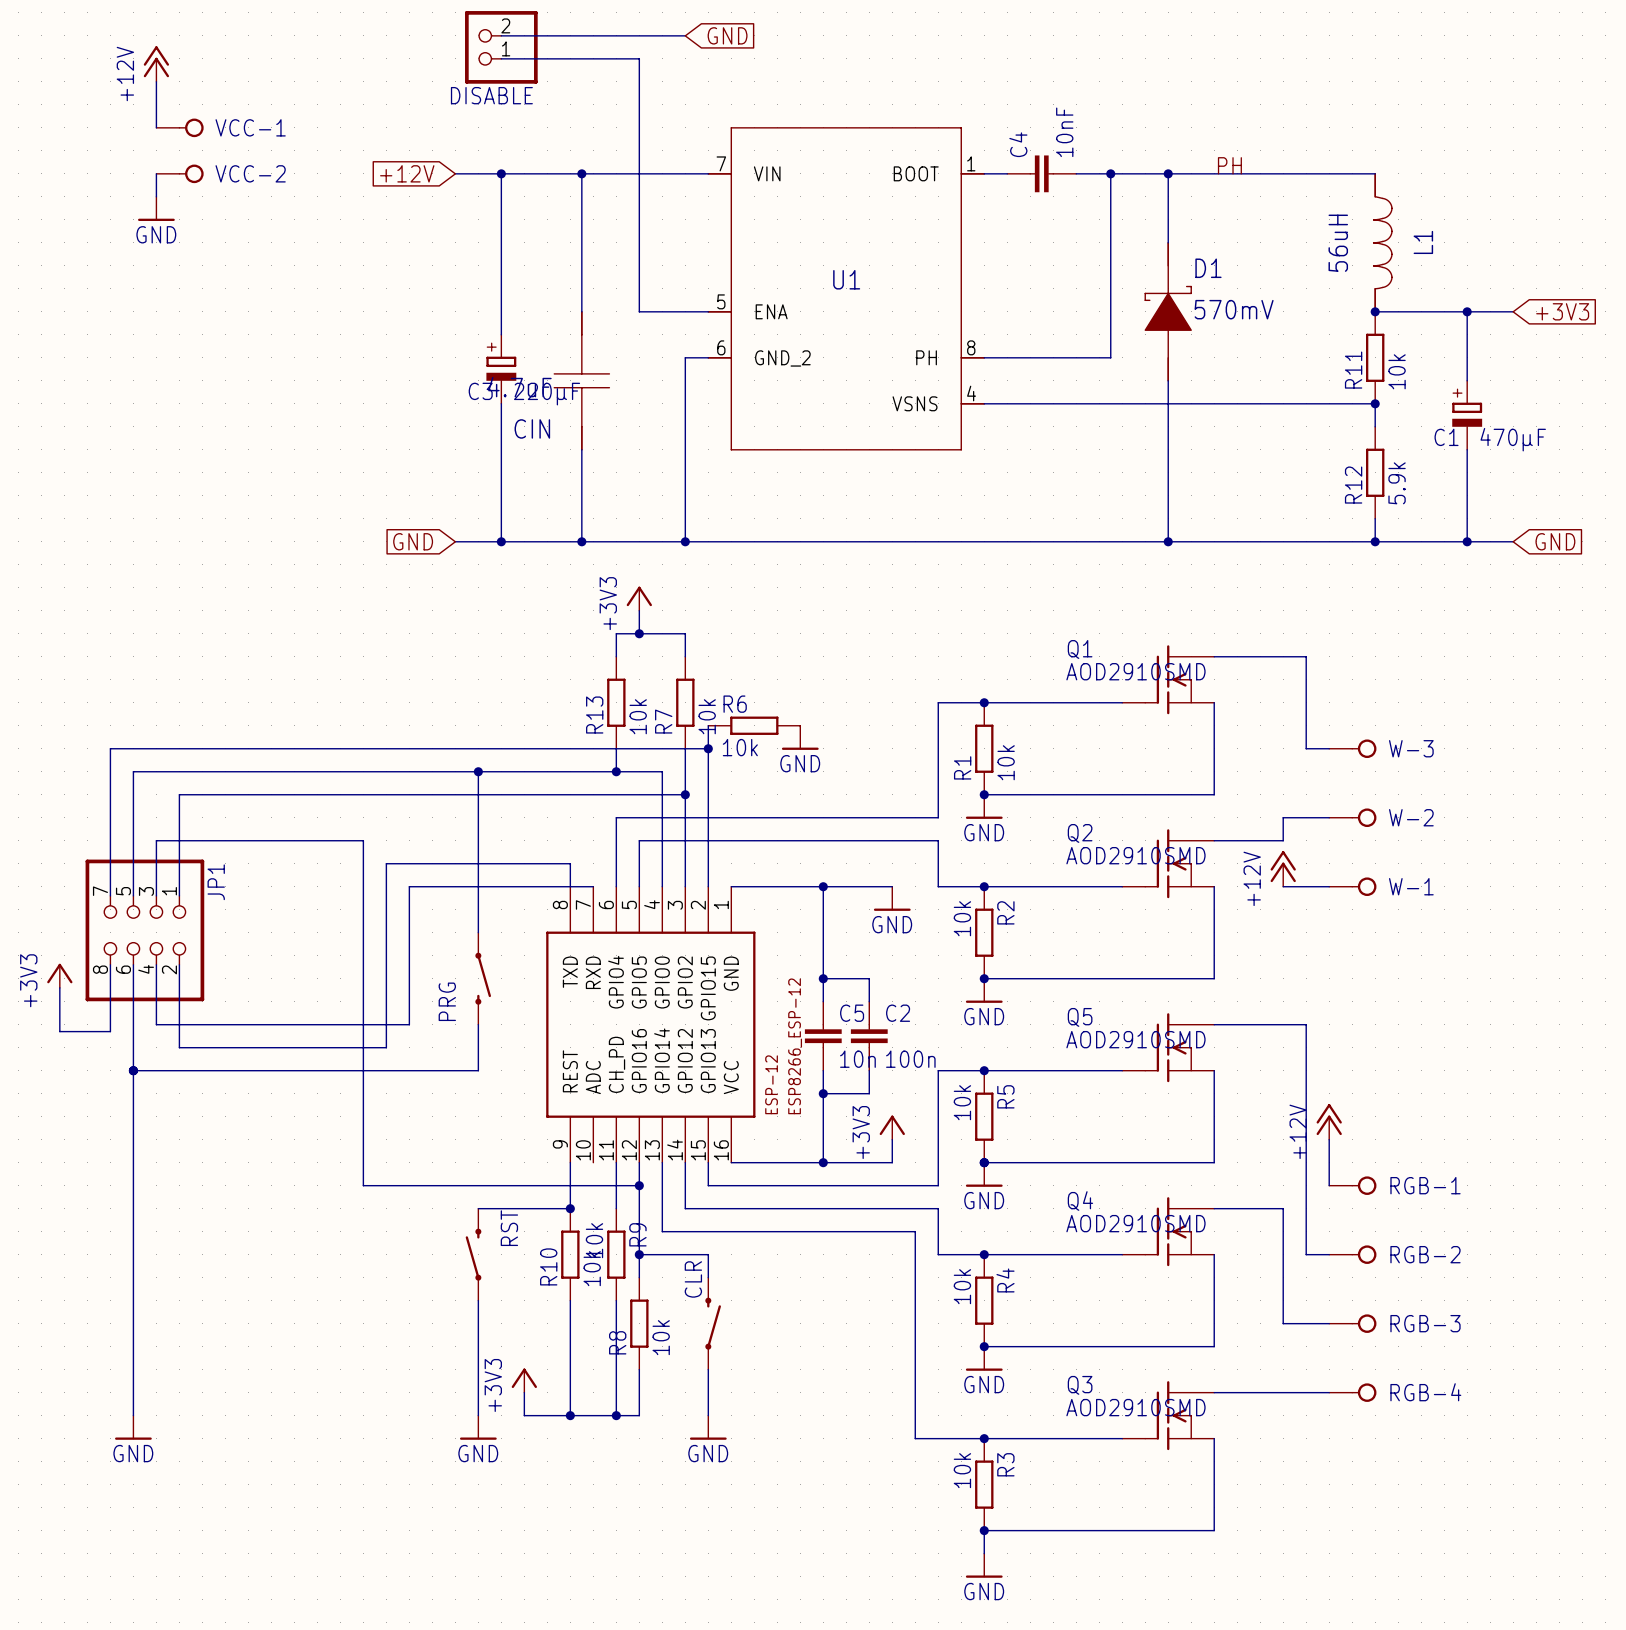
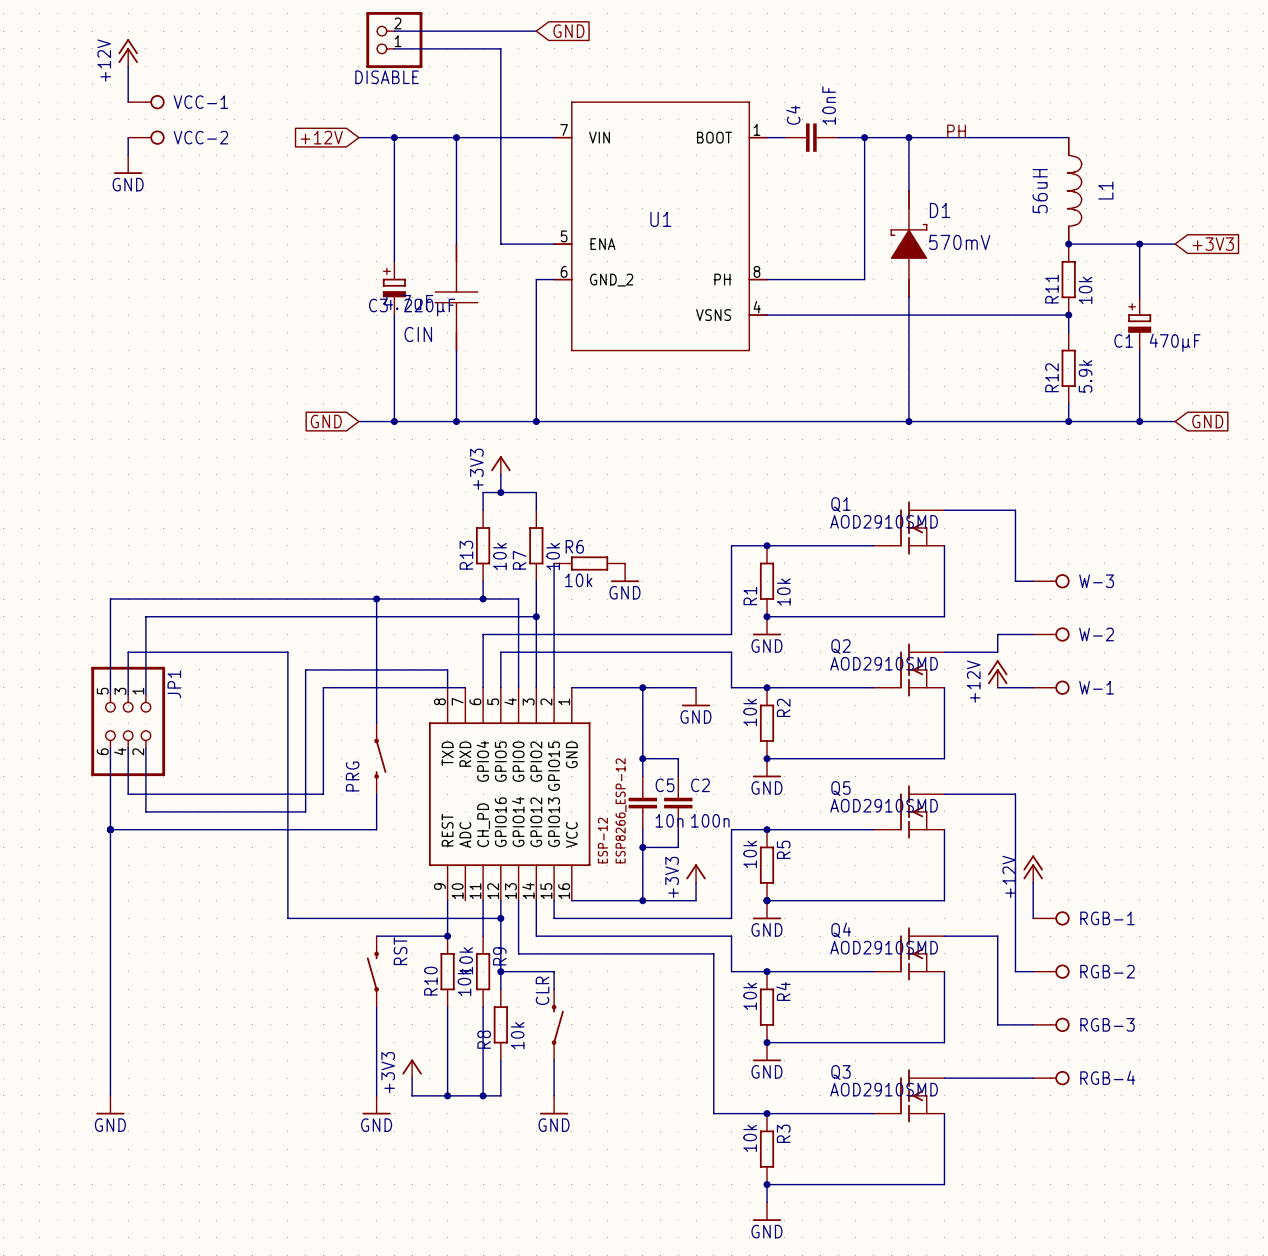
wire: (708, 748) (110, 748) (110, 895) -> none
junction: (708, 748) -> none
JP1 symbol: [85, 859, 205, 1002] -> [91, 666, 166, 777]
wire: (110, 964) (110, 1031) (59, 1031) (59, 987) -> none
power symbol: +3V3 (59, 975) -> none

